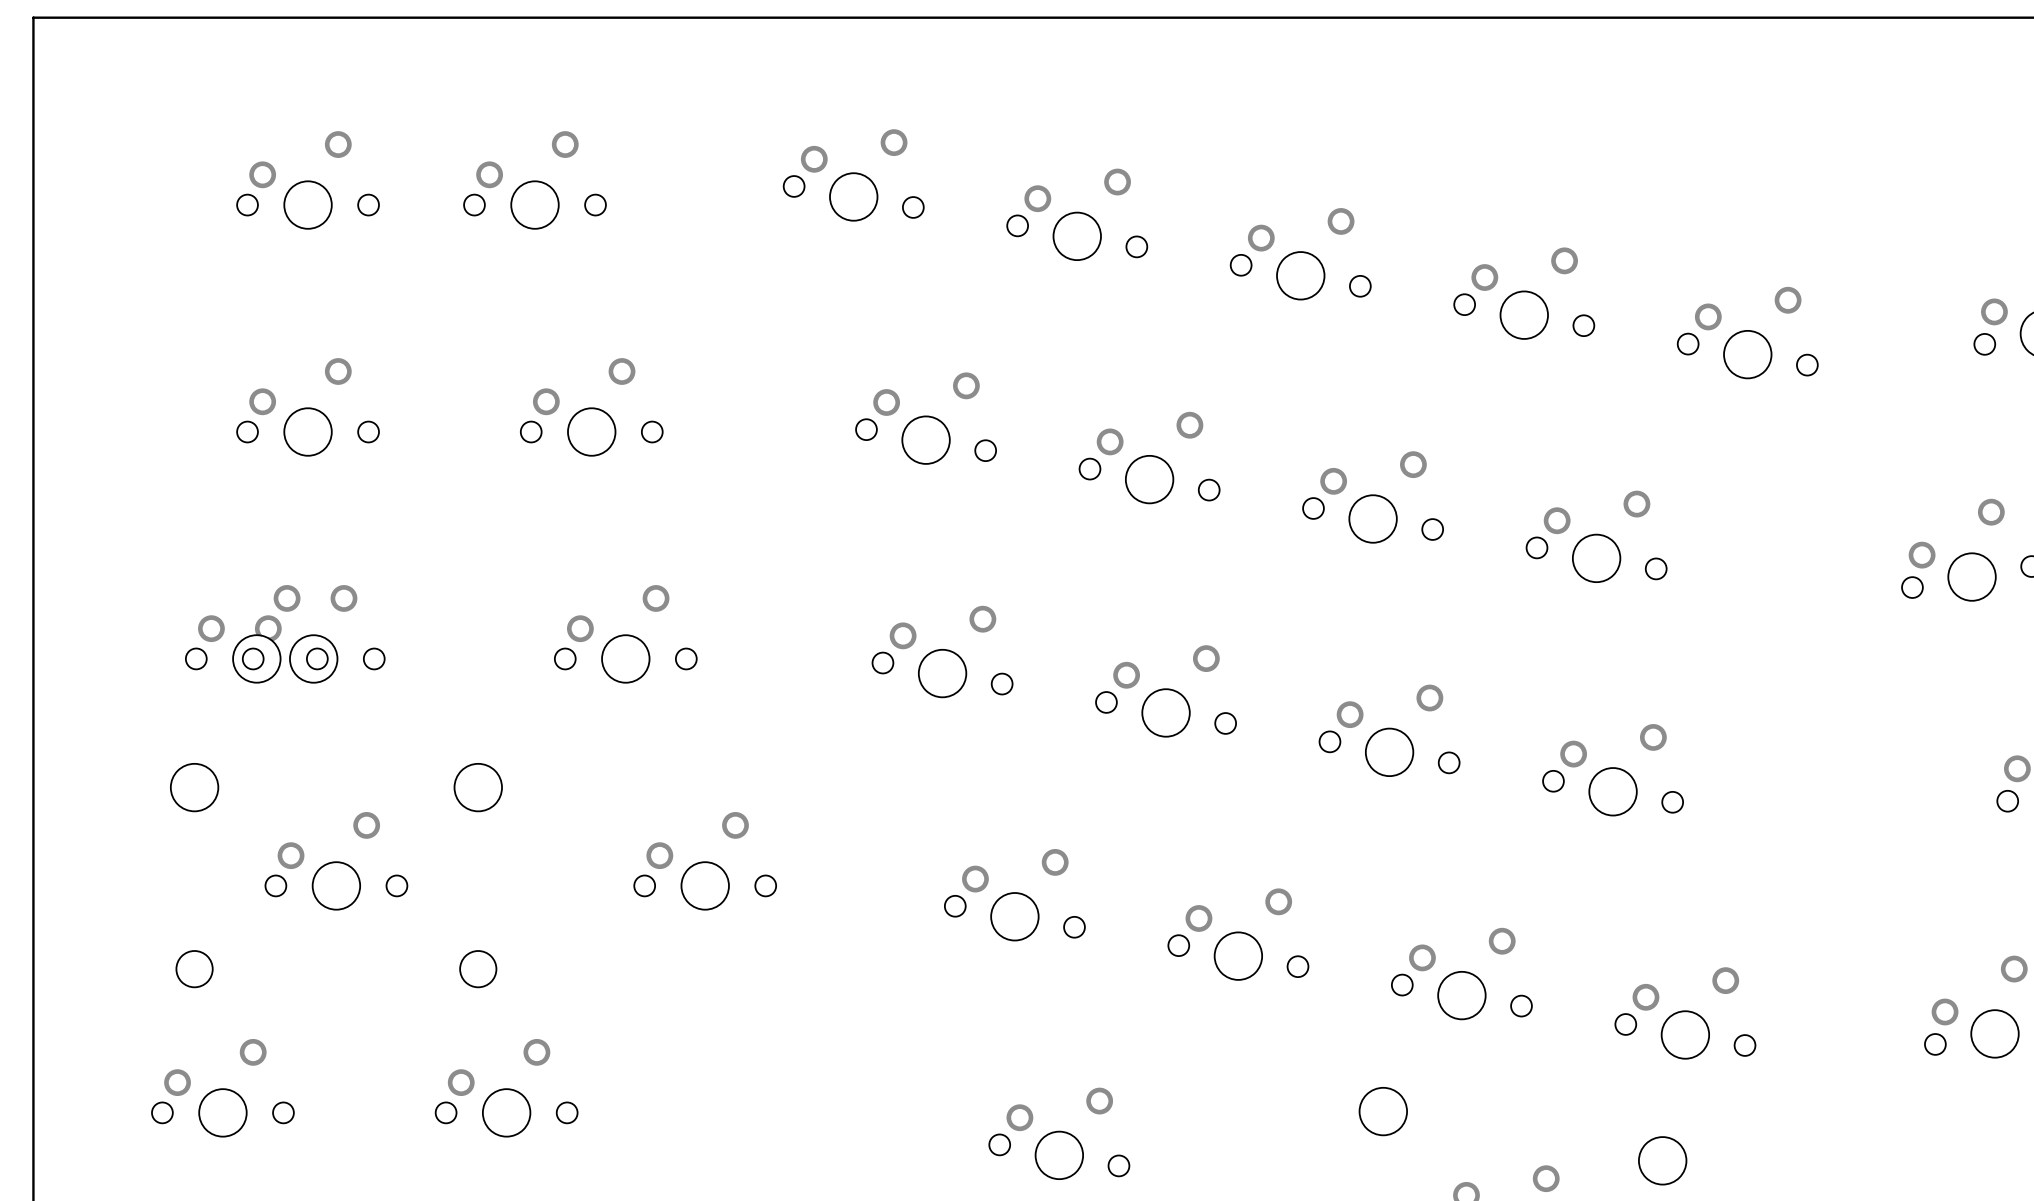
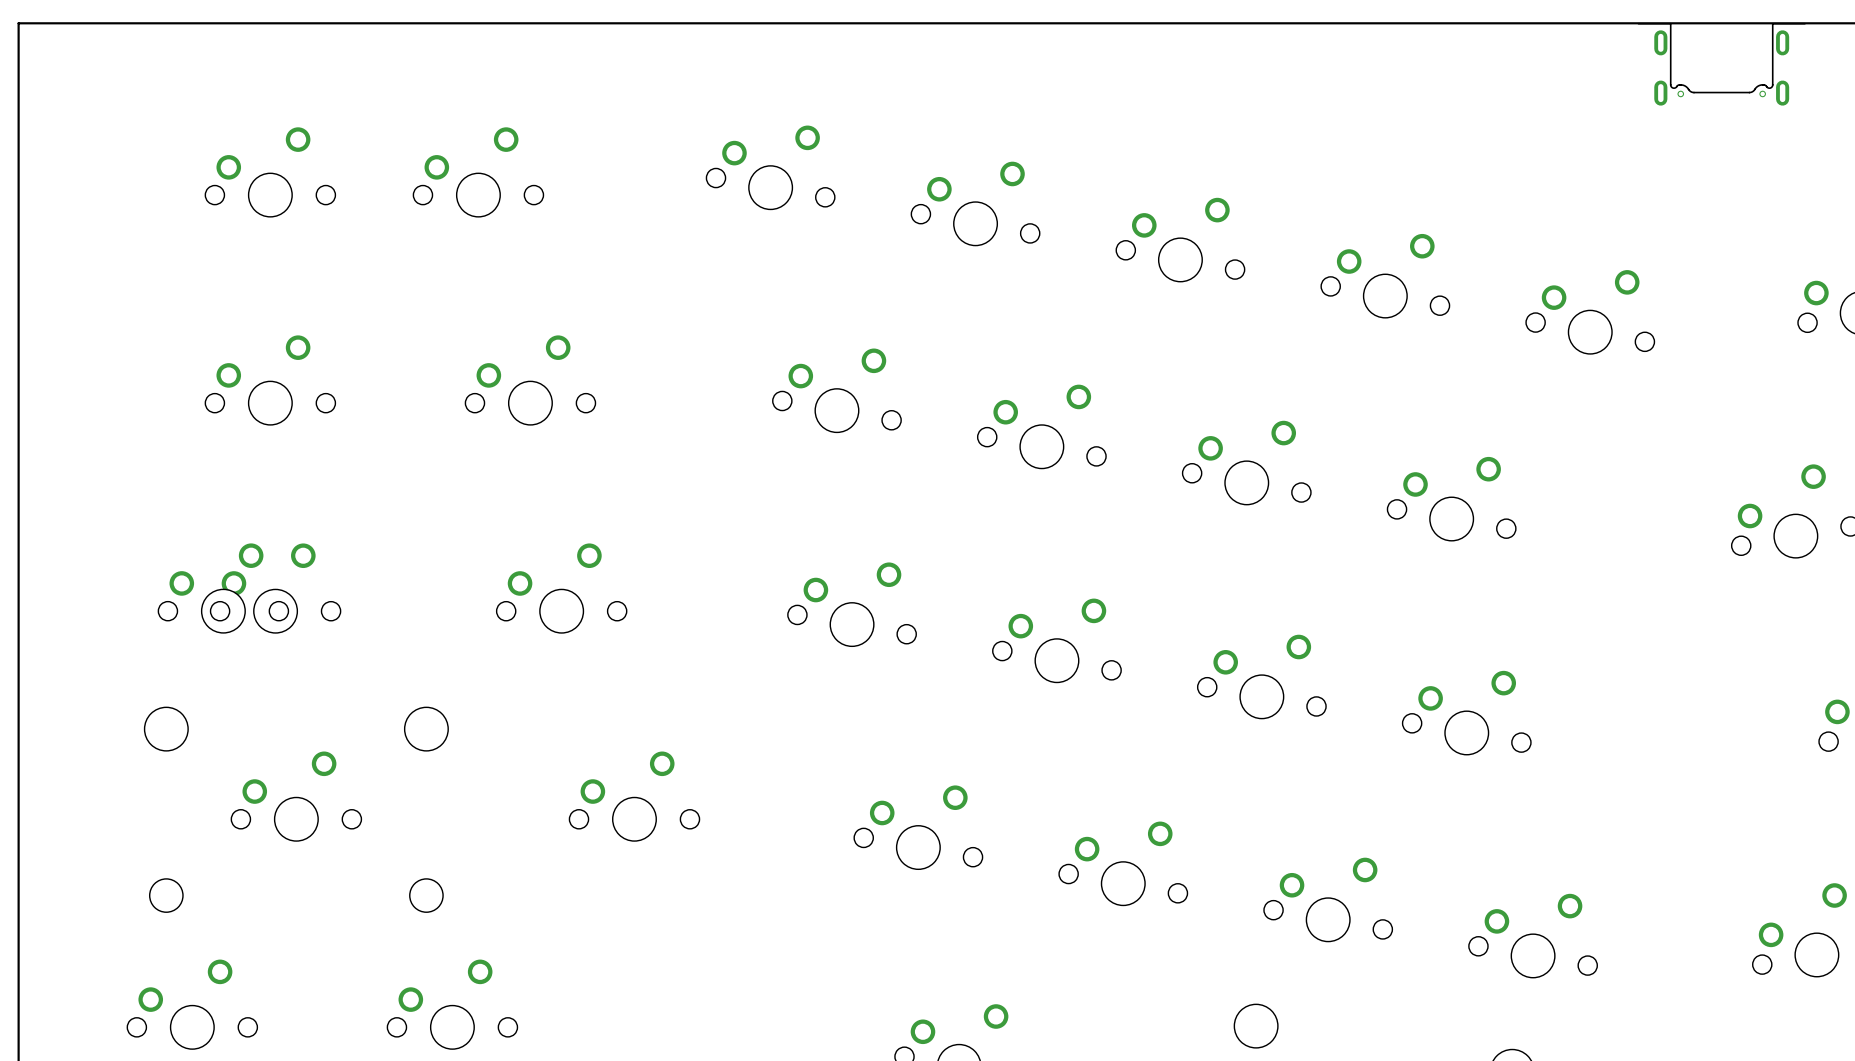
part: none -> (1721, 64)

